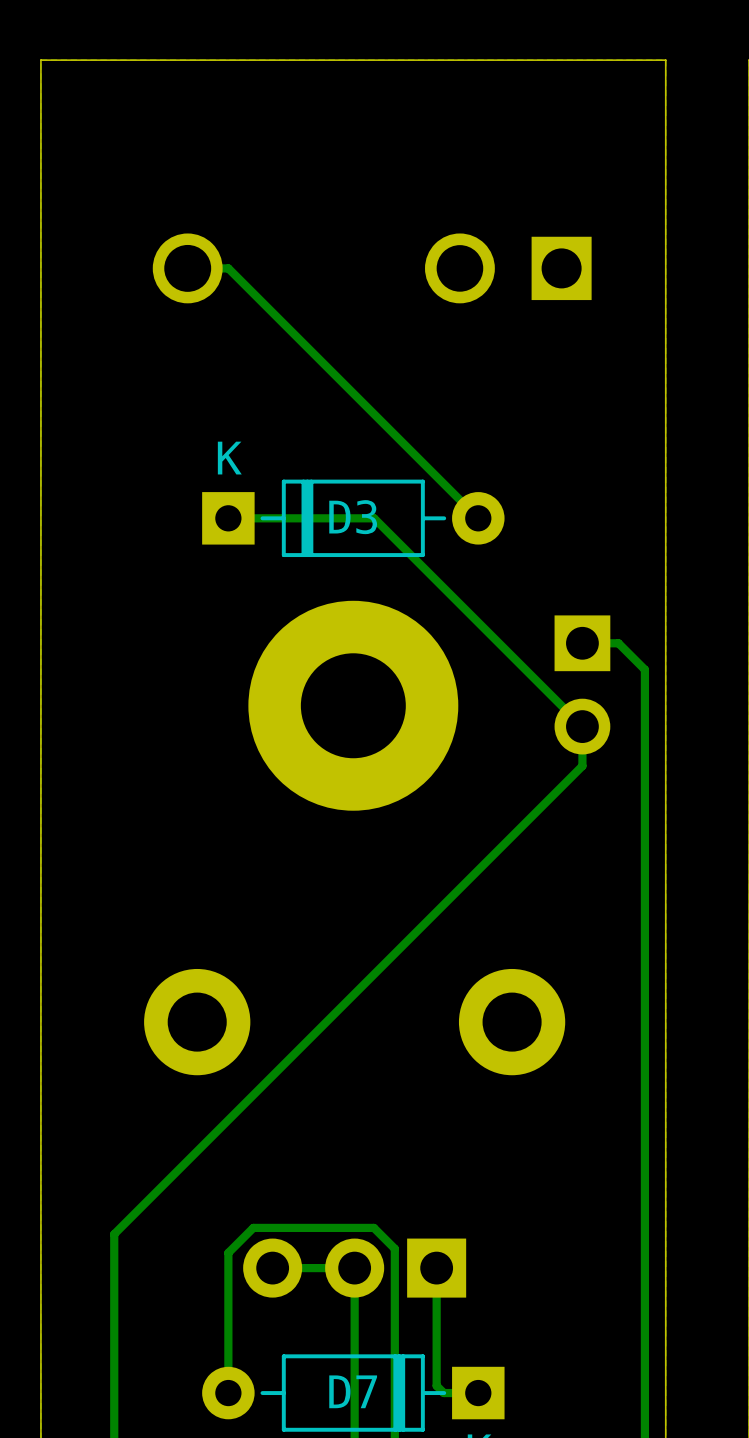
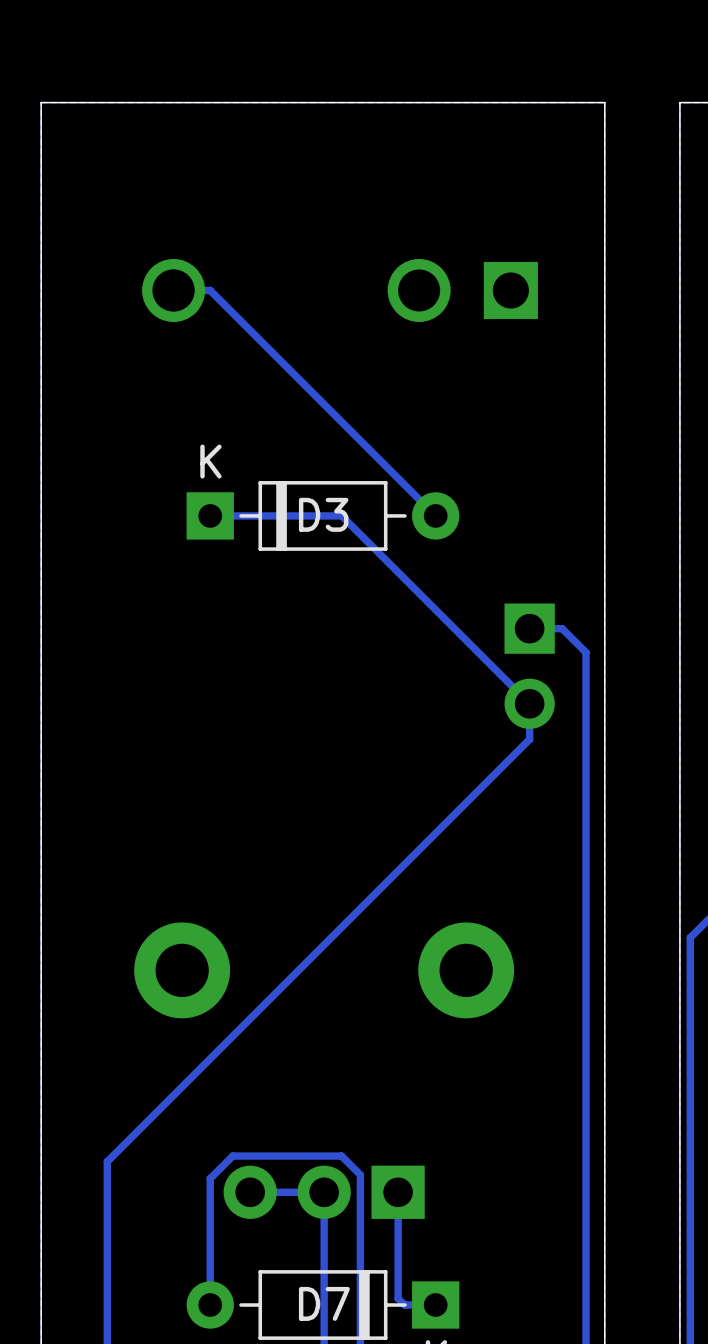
part: (353, 705) -> none

